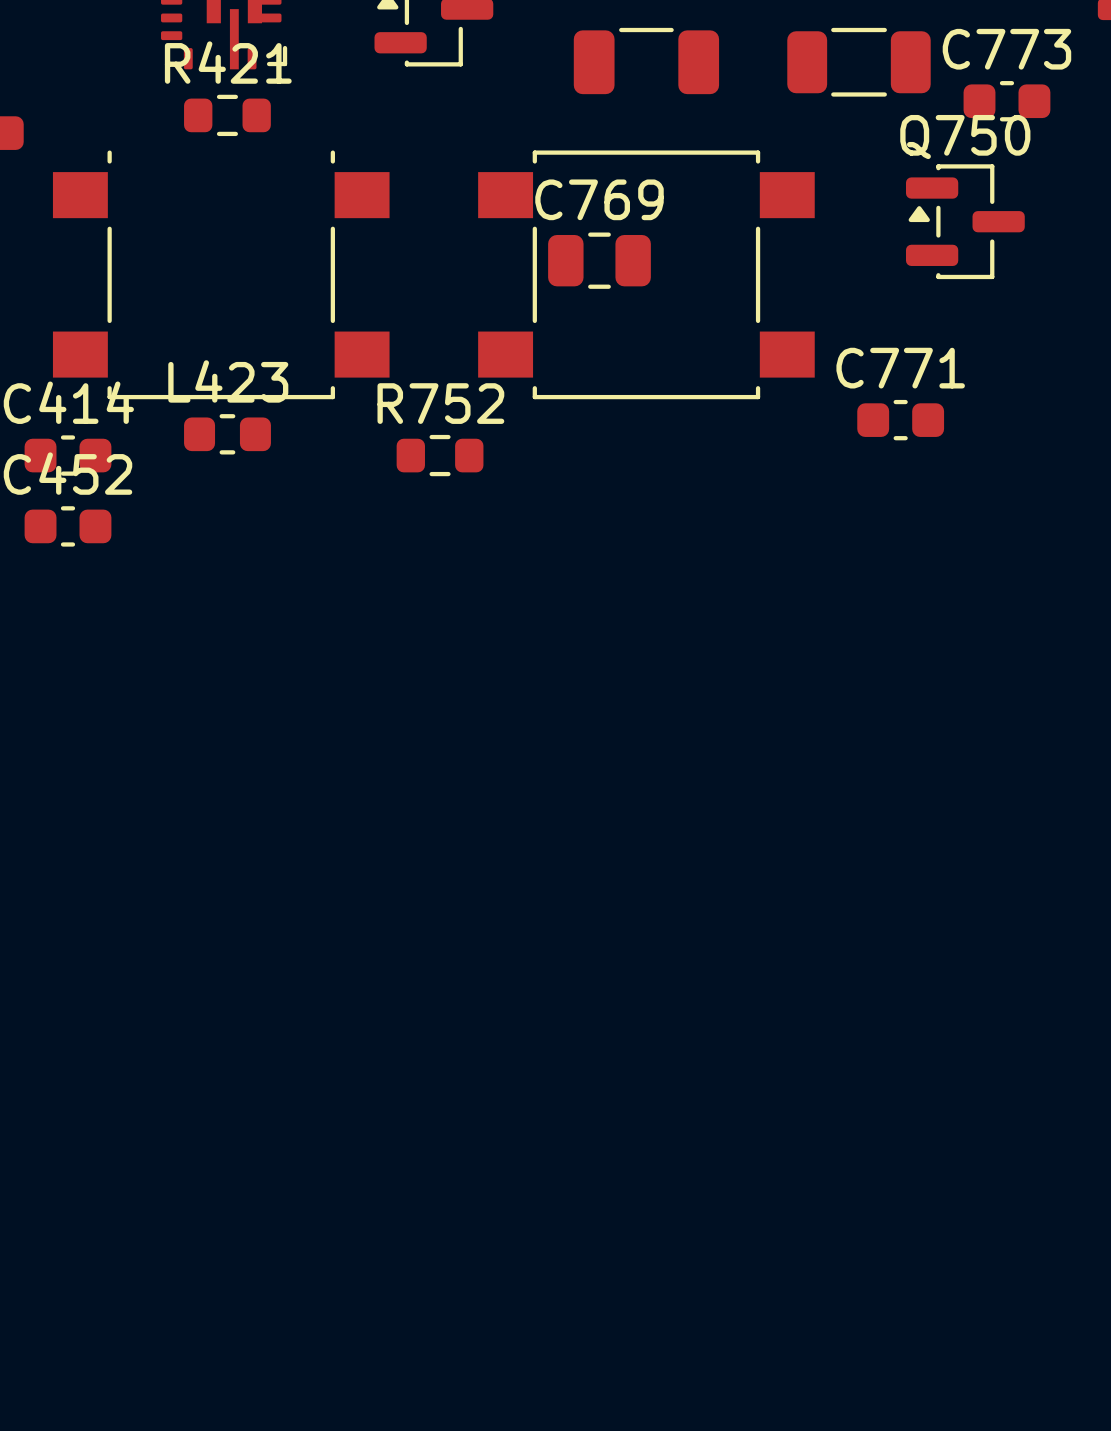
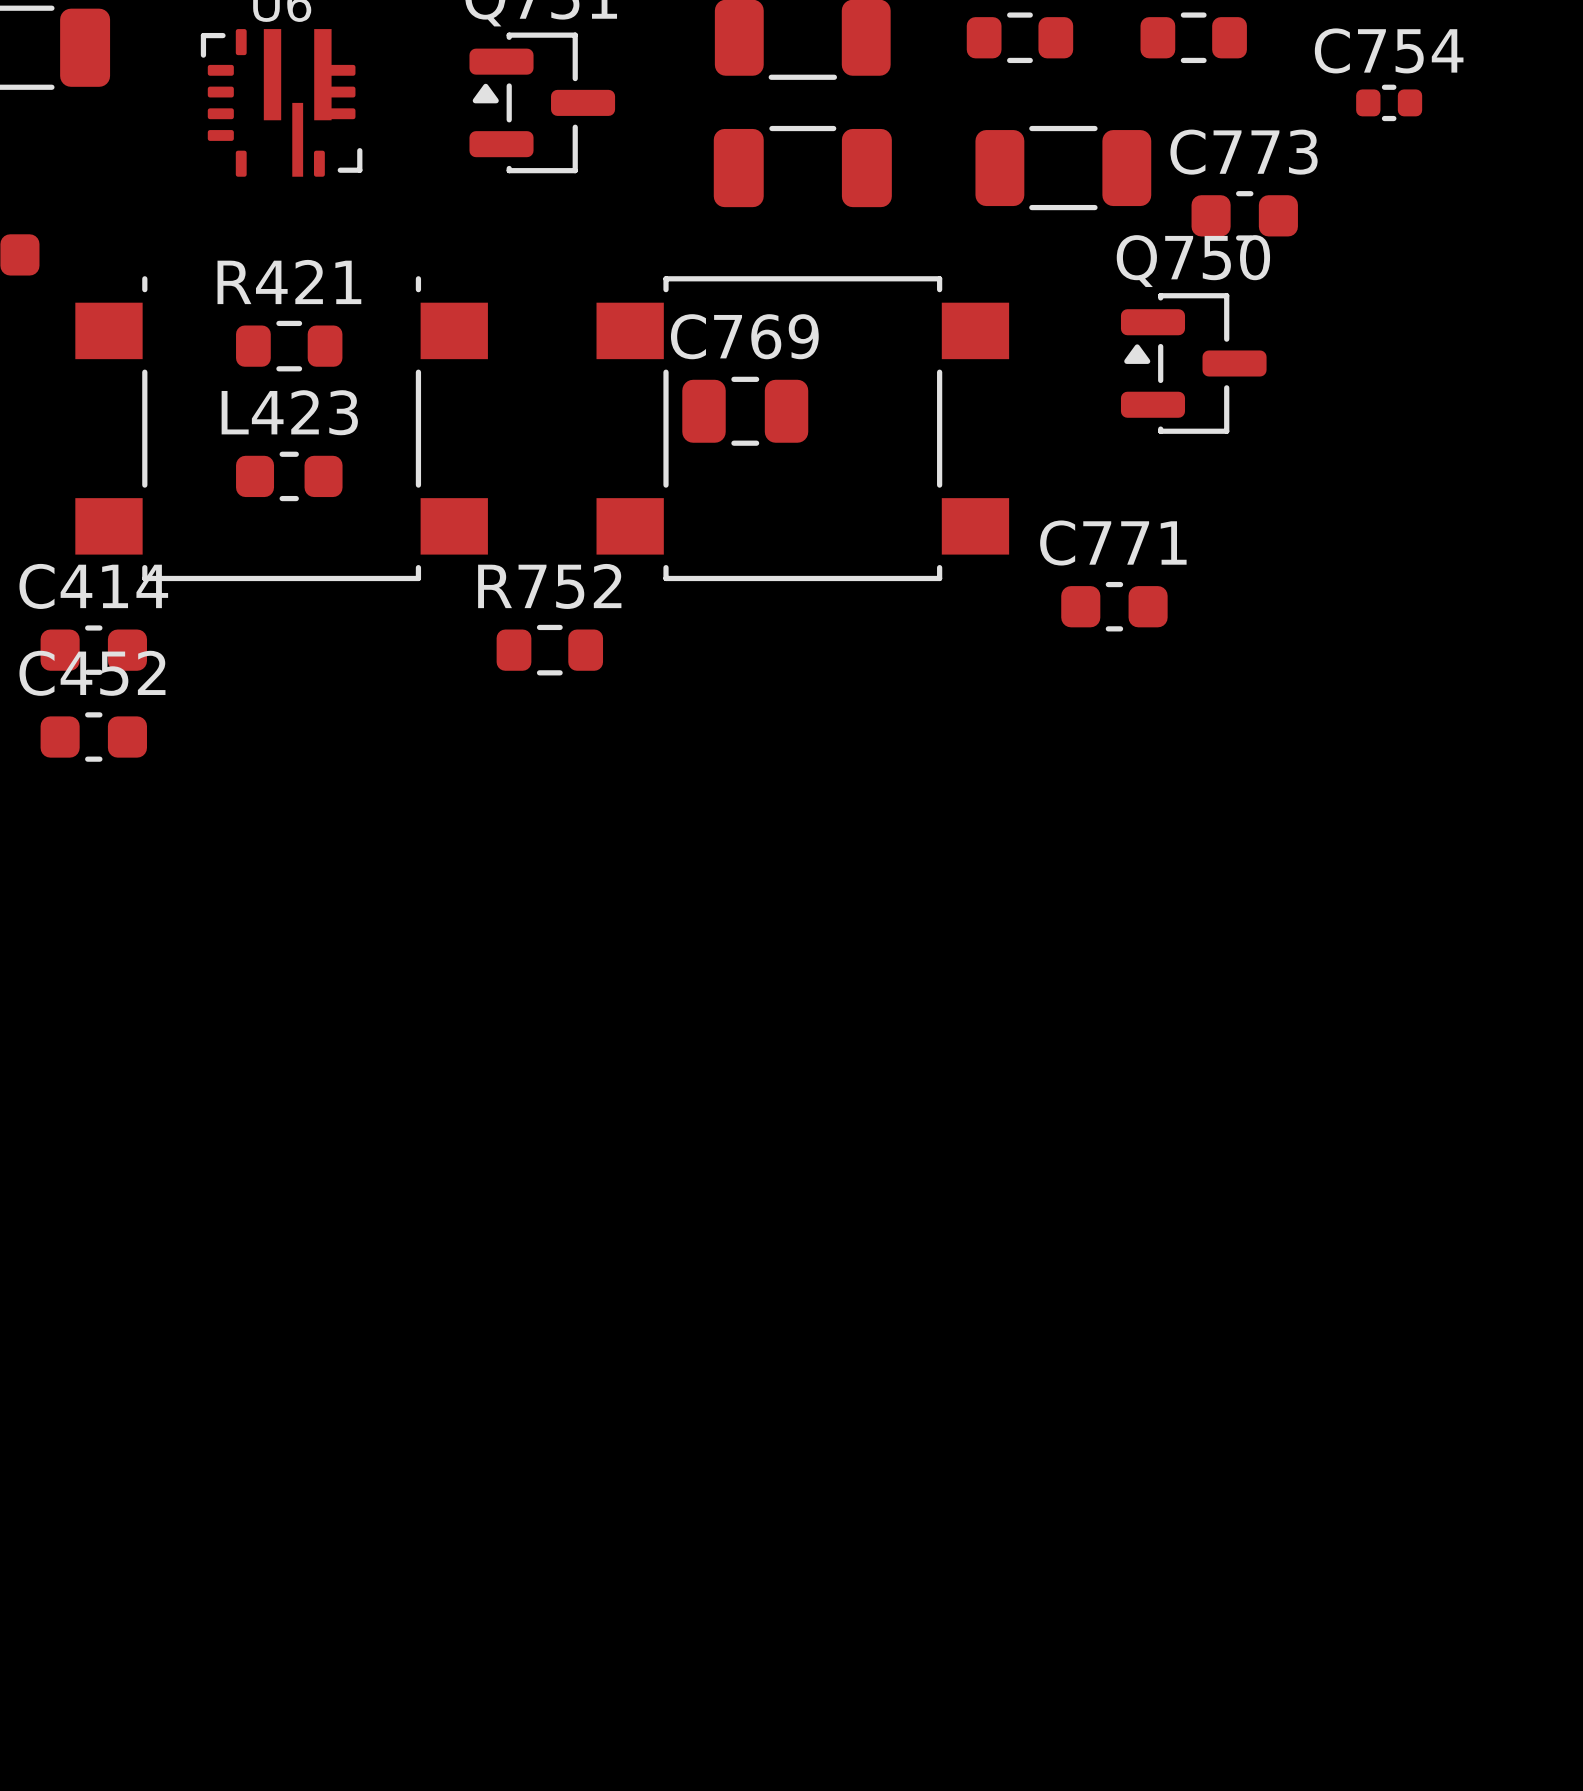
R421 position: (227, 115) -> (289, 346)
L423 position: (227, 434) -> (289, 476)

